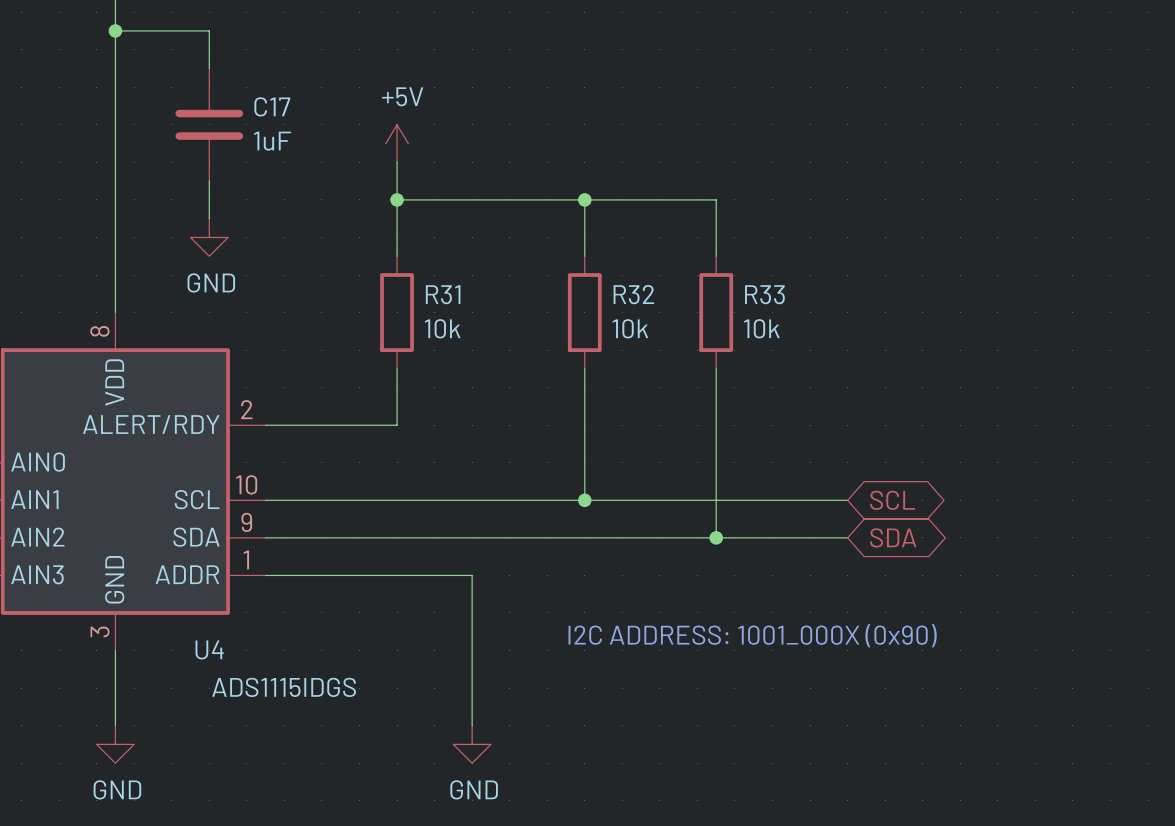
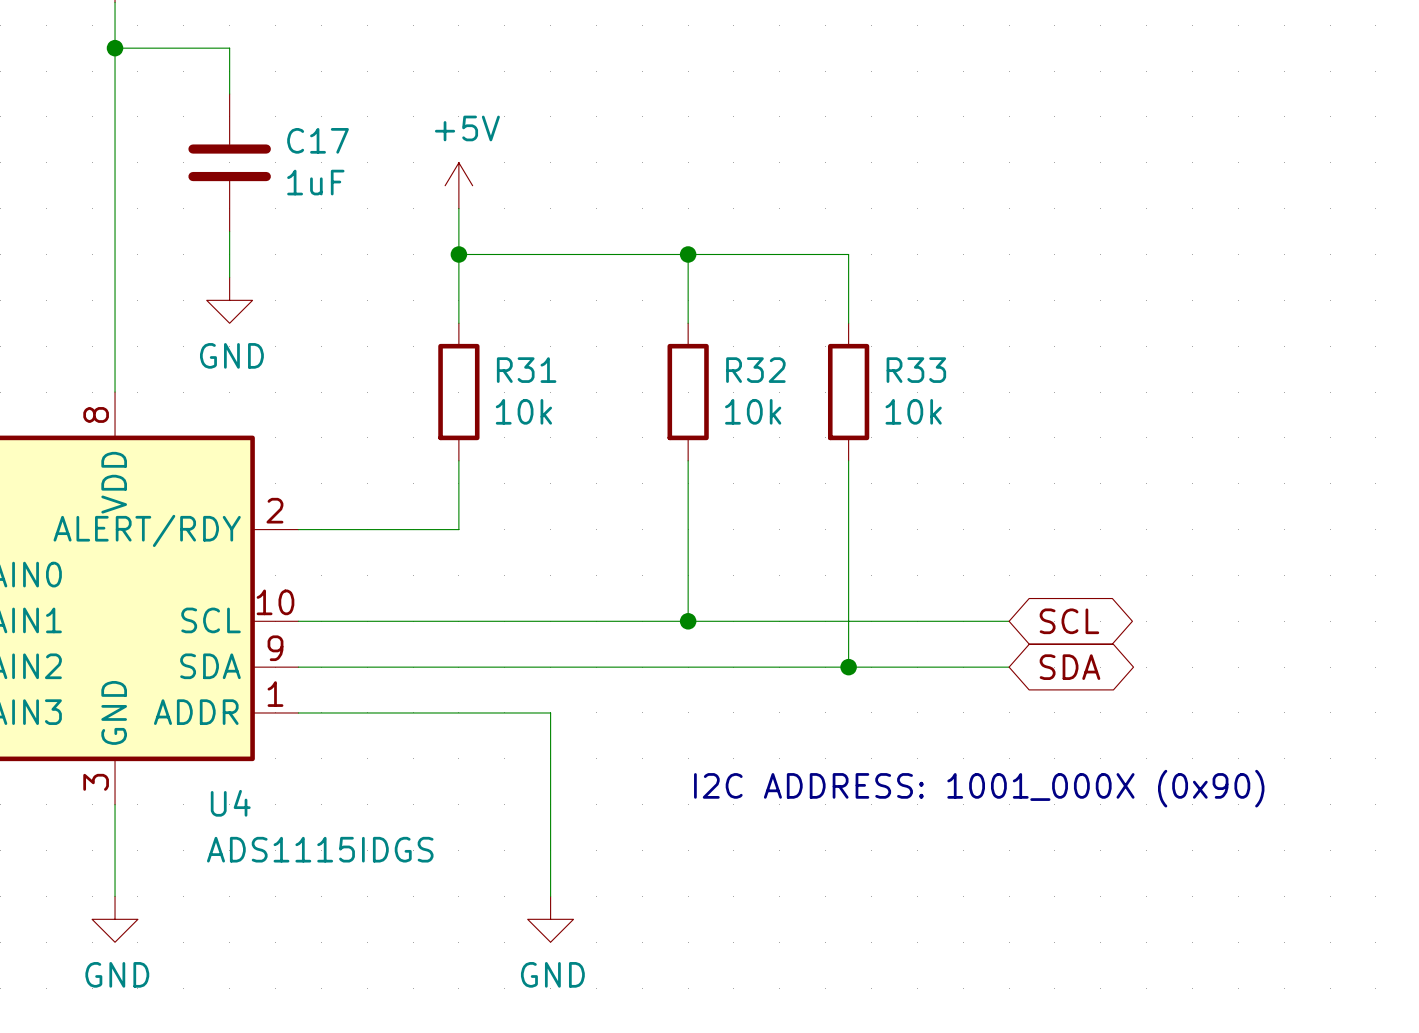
text position: I2C ADDRESS: 1001_000X (0x90) (752, 635) -> I2C ADDRESS: 1001_000X (0x90) (979, 788)

